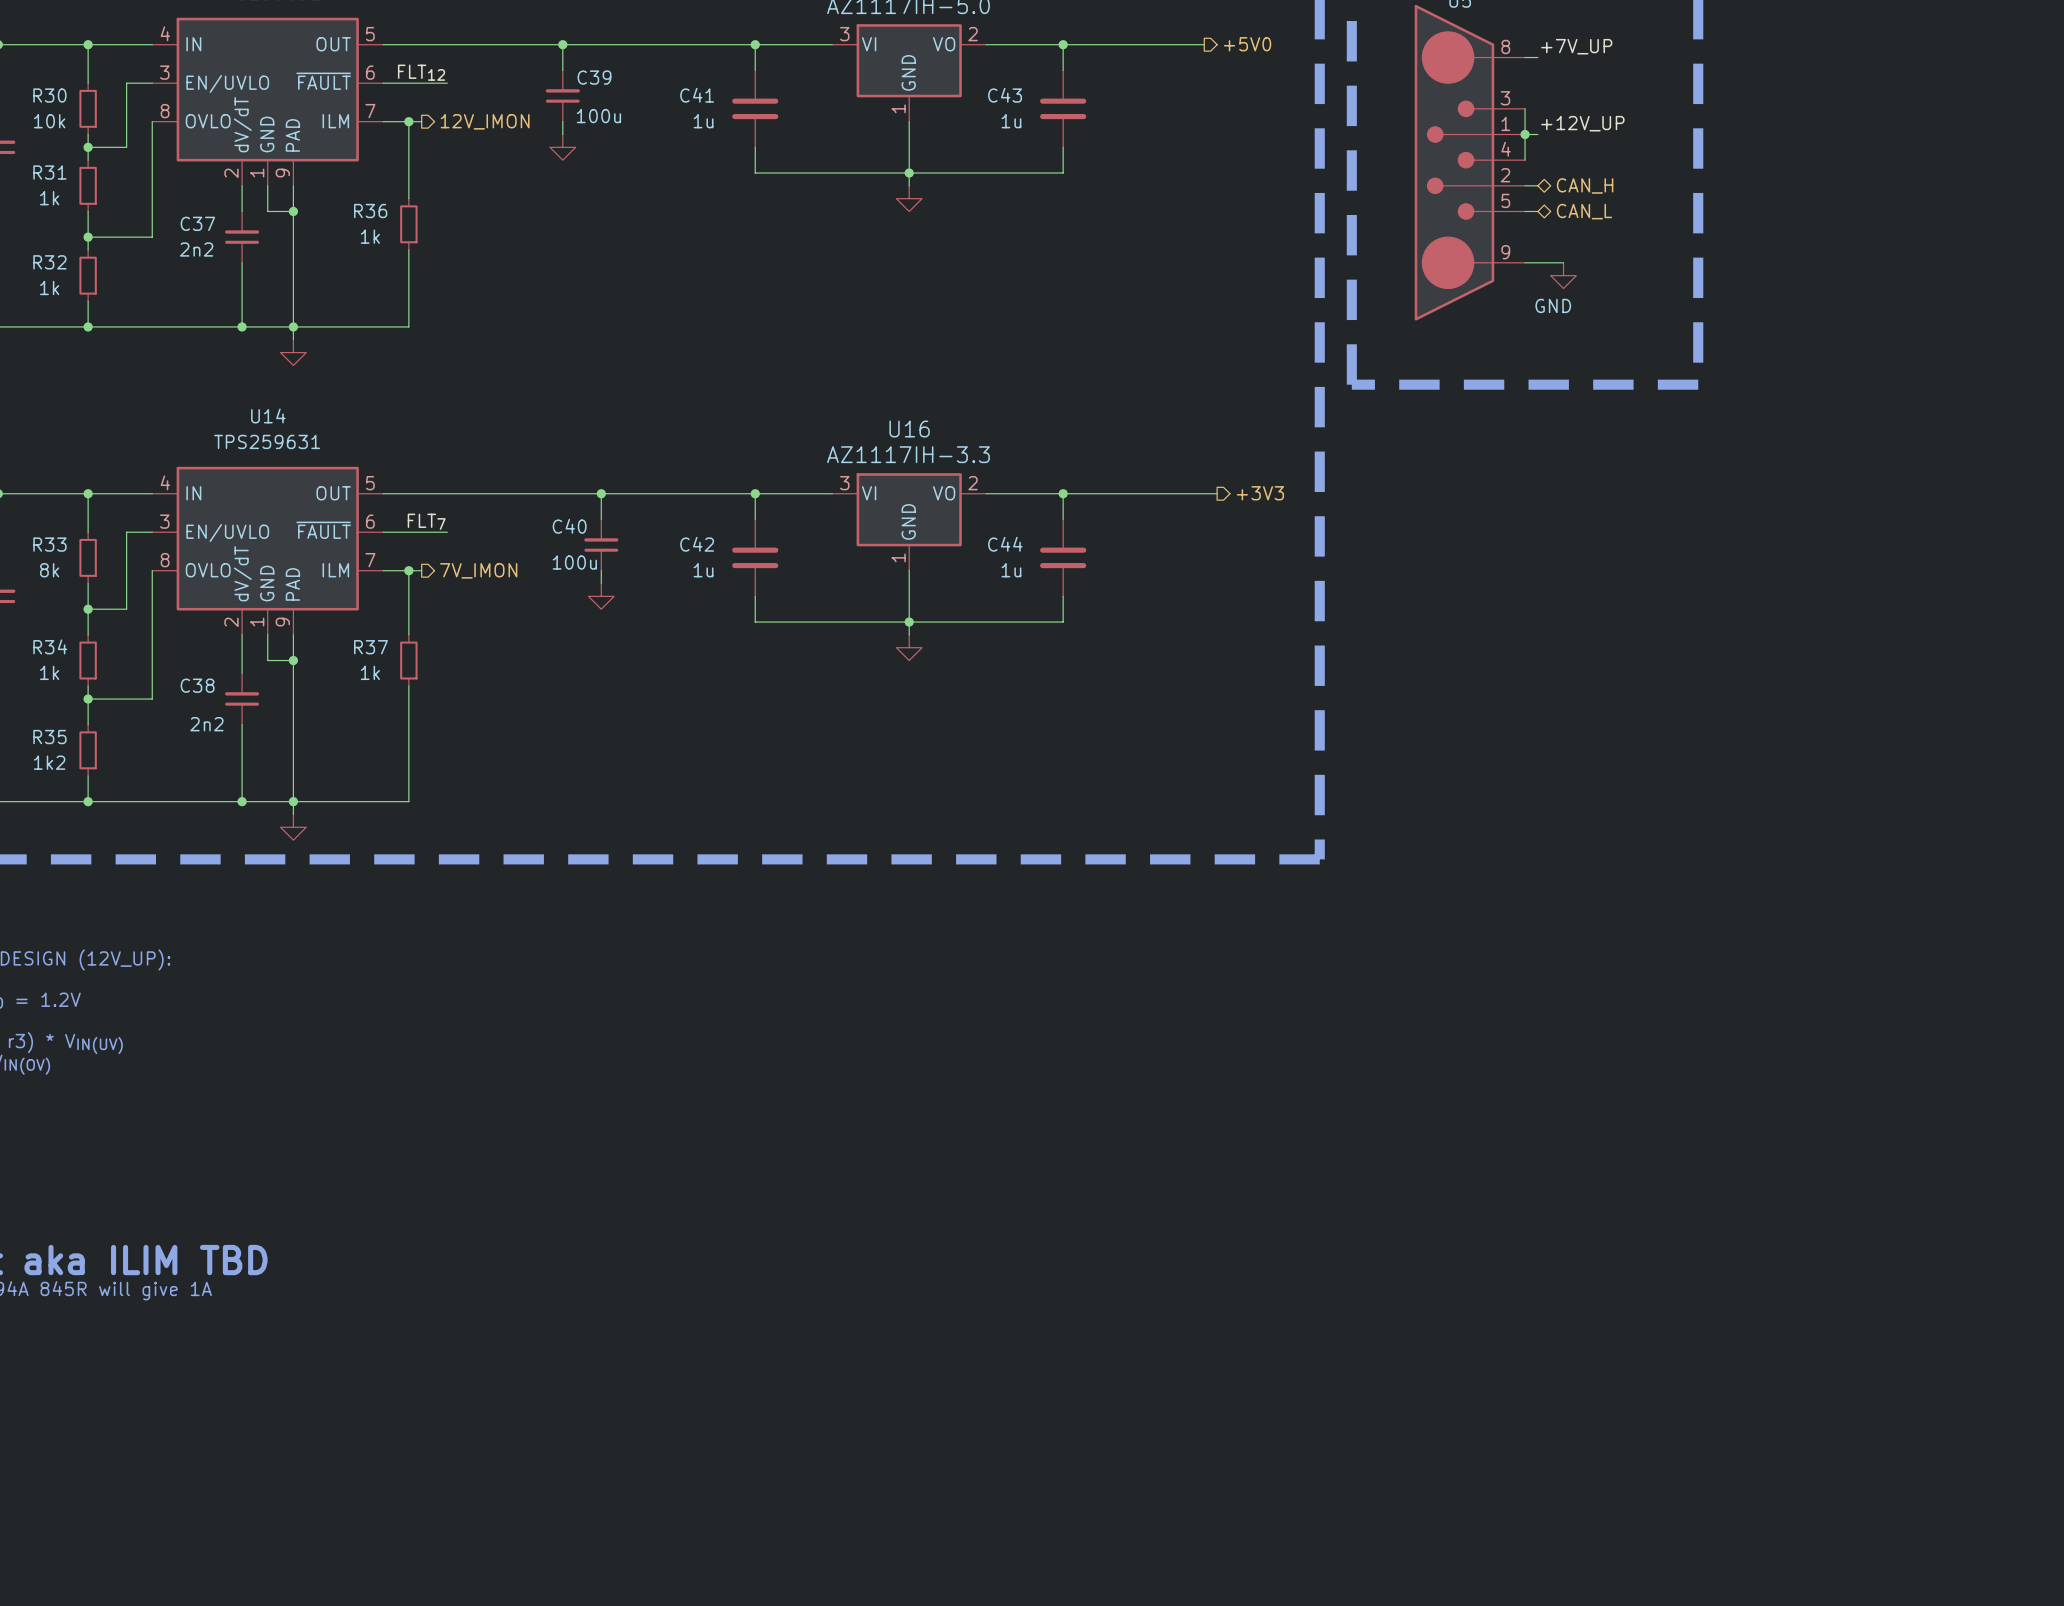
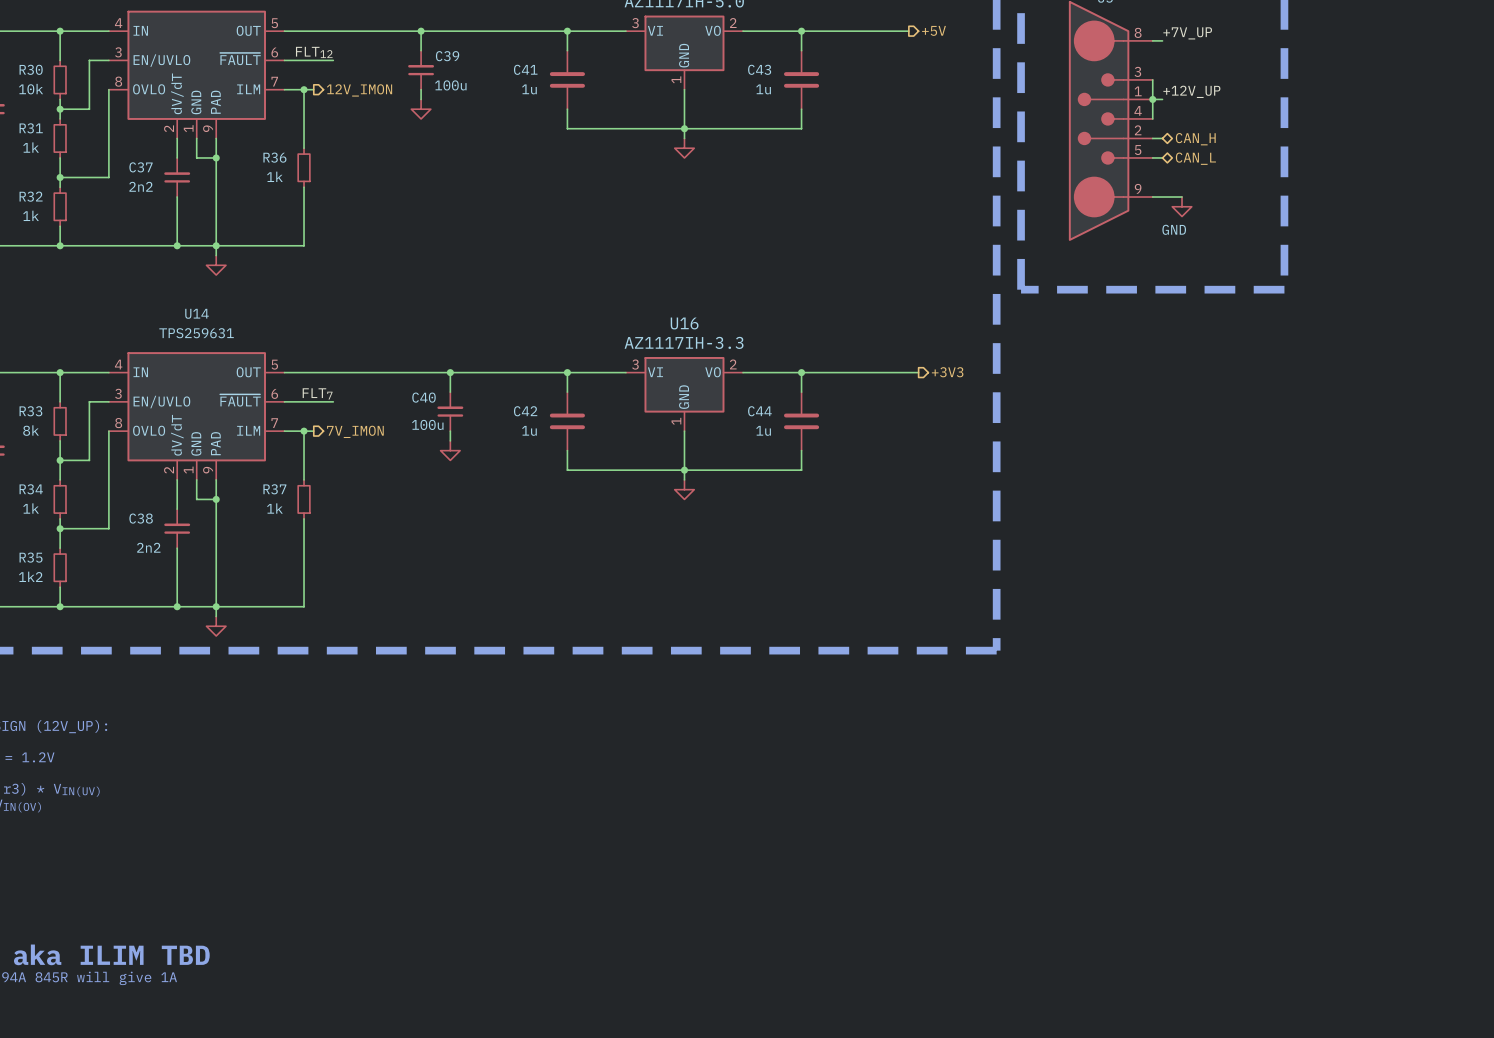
hierarchical label: +5V0 (1247, 44) -> +5V (934, 30)

